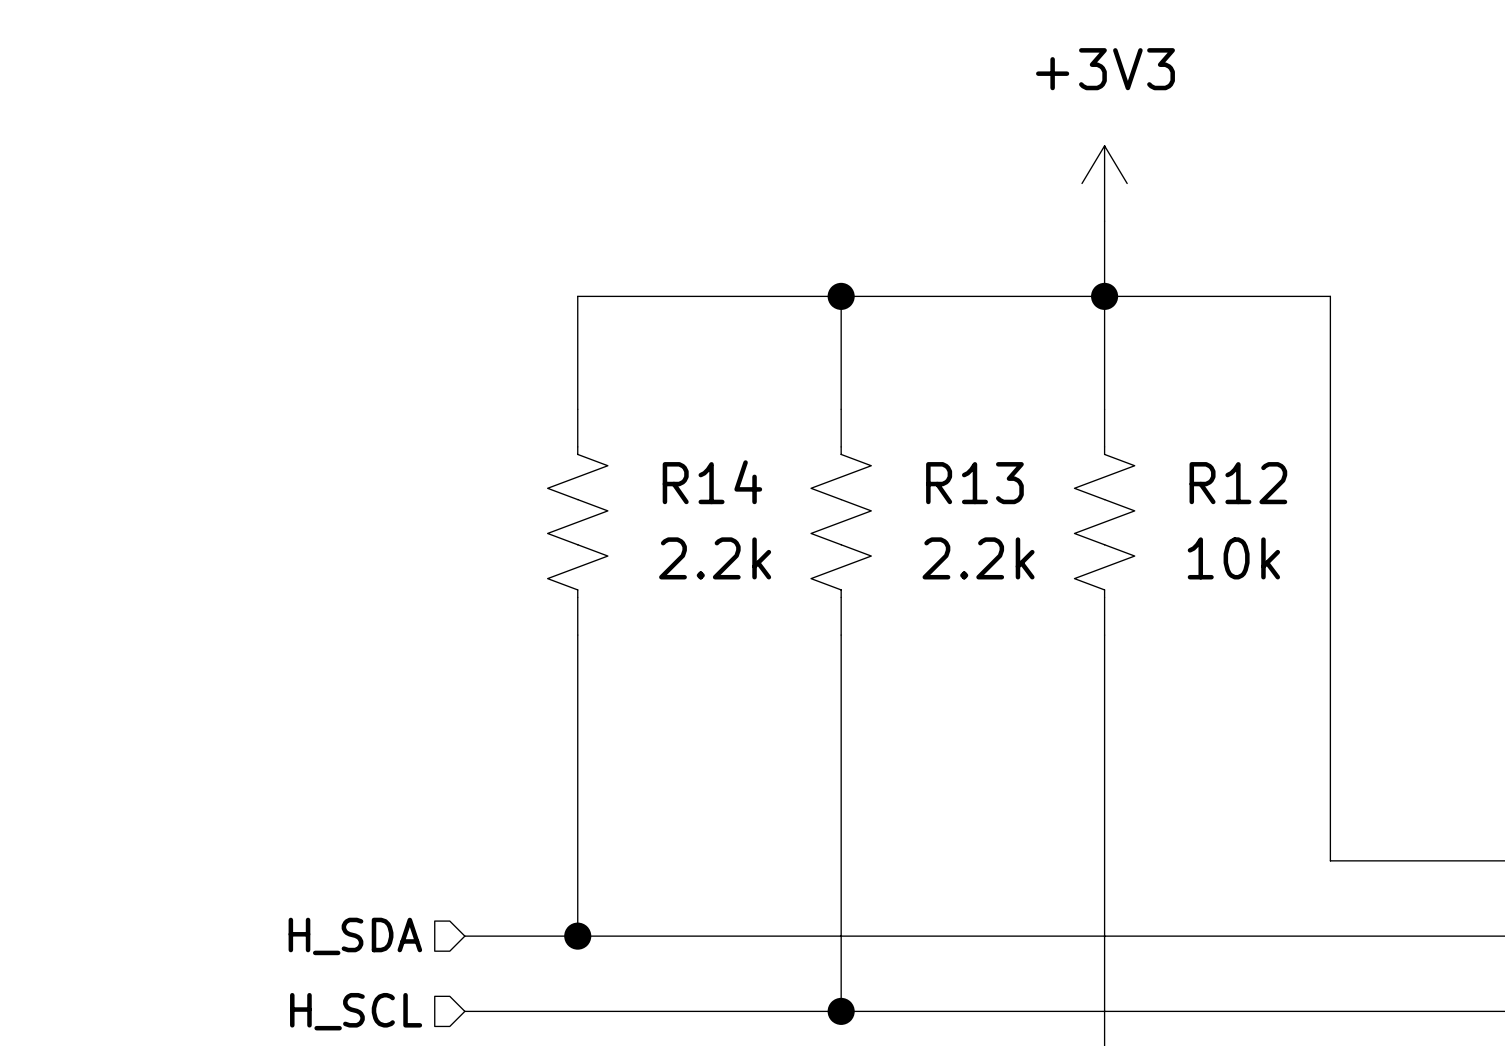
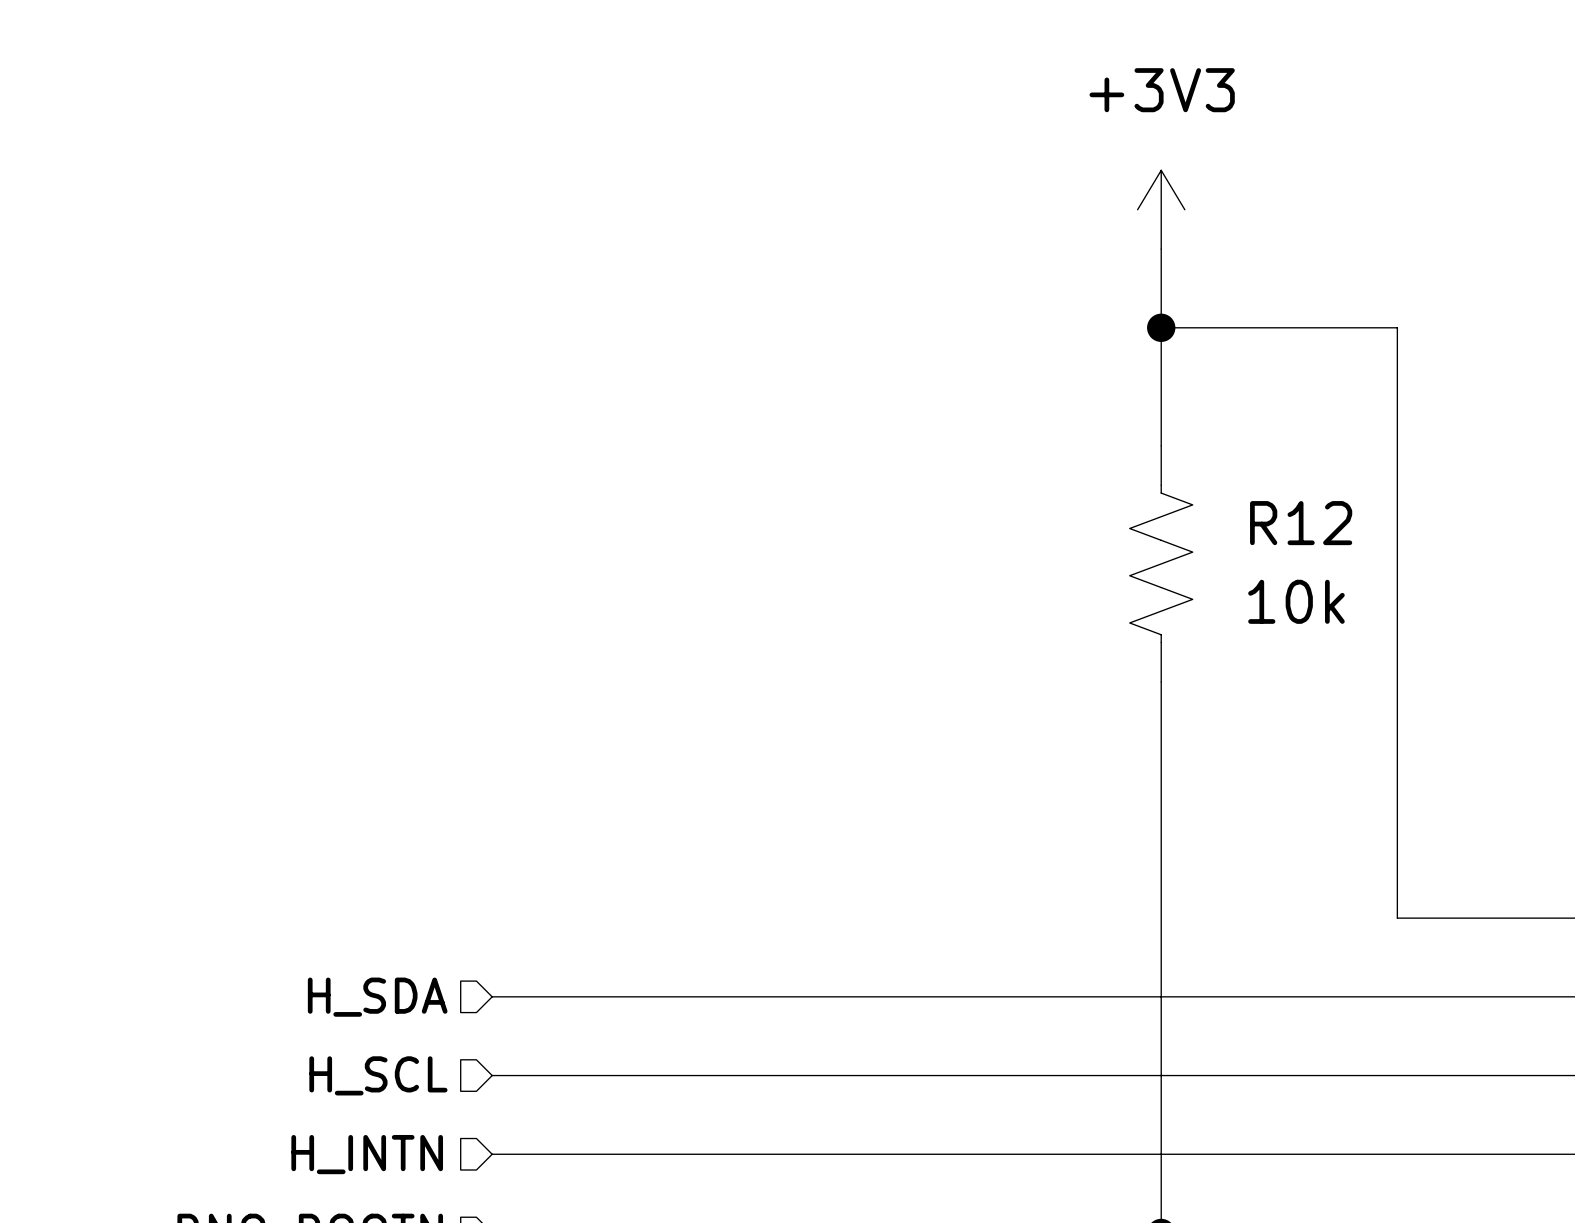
wire: (841, 296) (841, 409) -> none
junction: (841, 296) -> none
wire: (1104, 296) (577, 296) (577, 409) -> none
R14: 2.2k (577, 522) -> none
R13: 2.2k (841, 522) -> none
wire: (577, 635) (577, 936) -> none
wire: (841, 635) (841, 1011) -> none
junction: (577, 936) -> none
junction: (841, 1011) -> none

